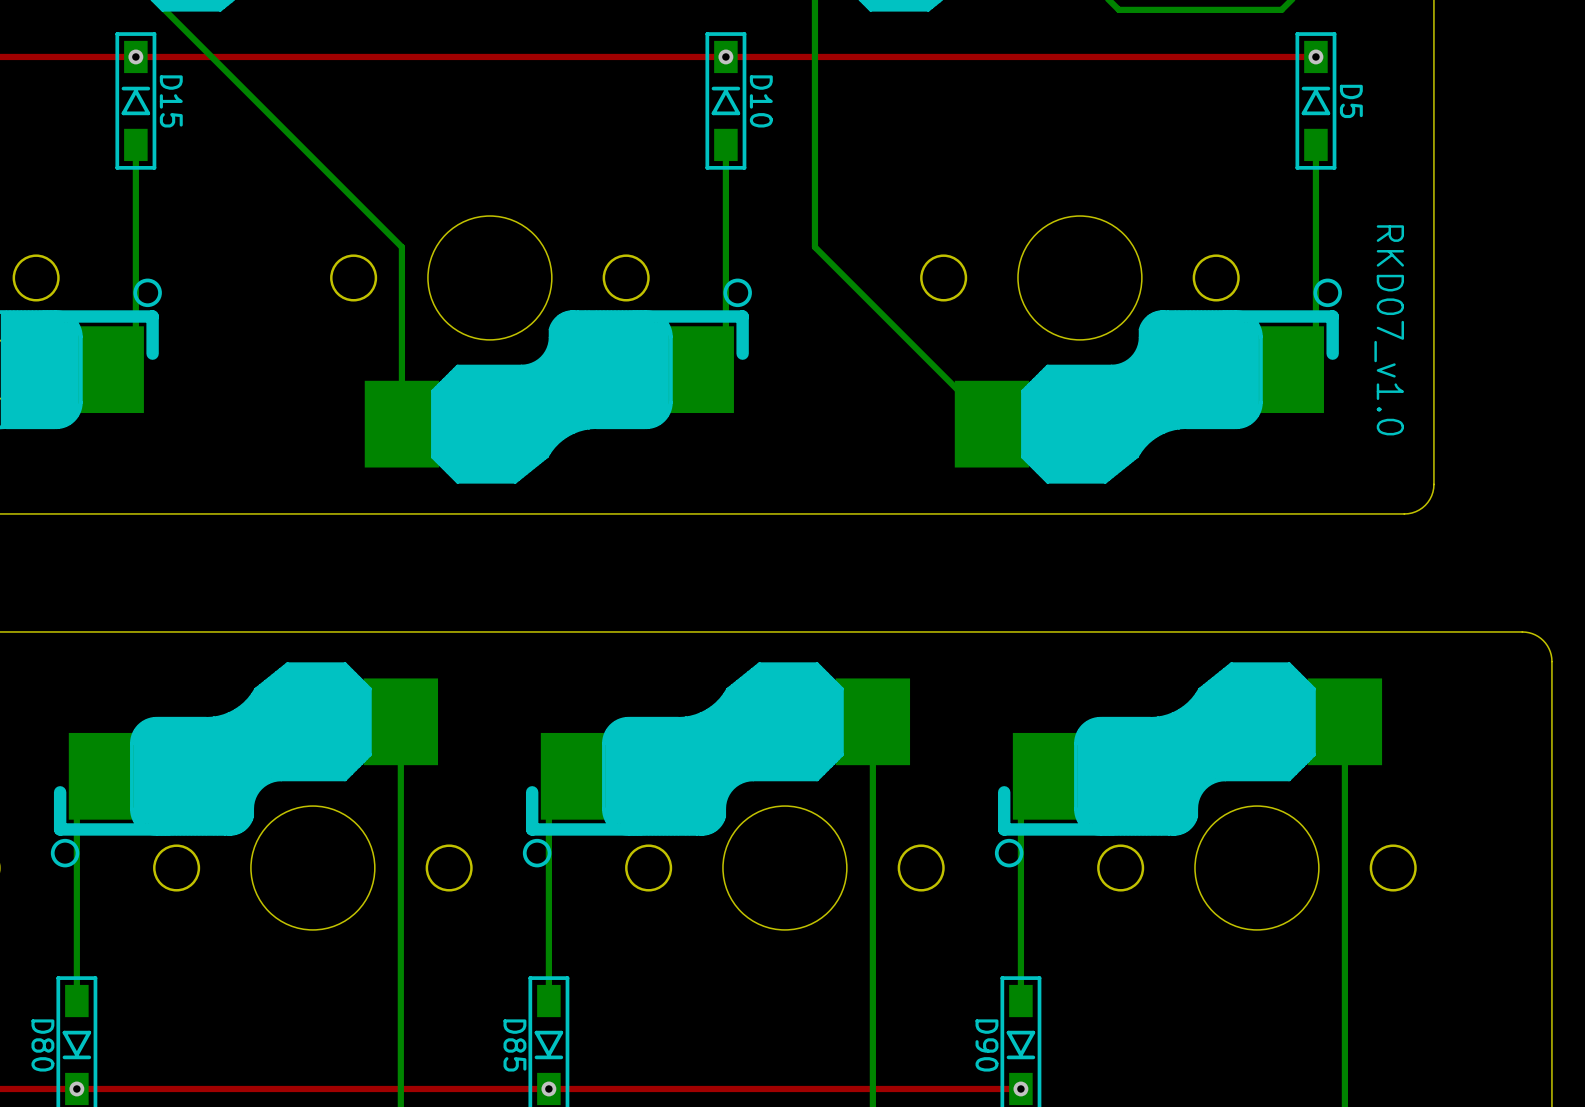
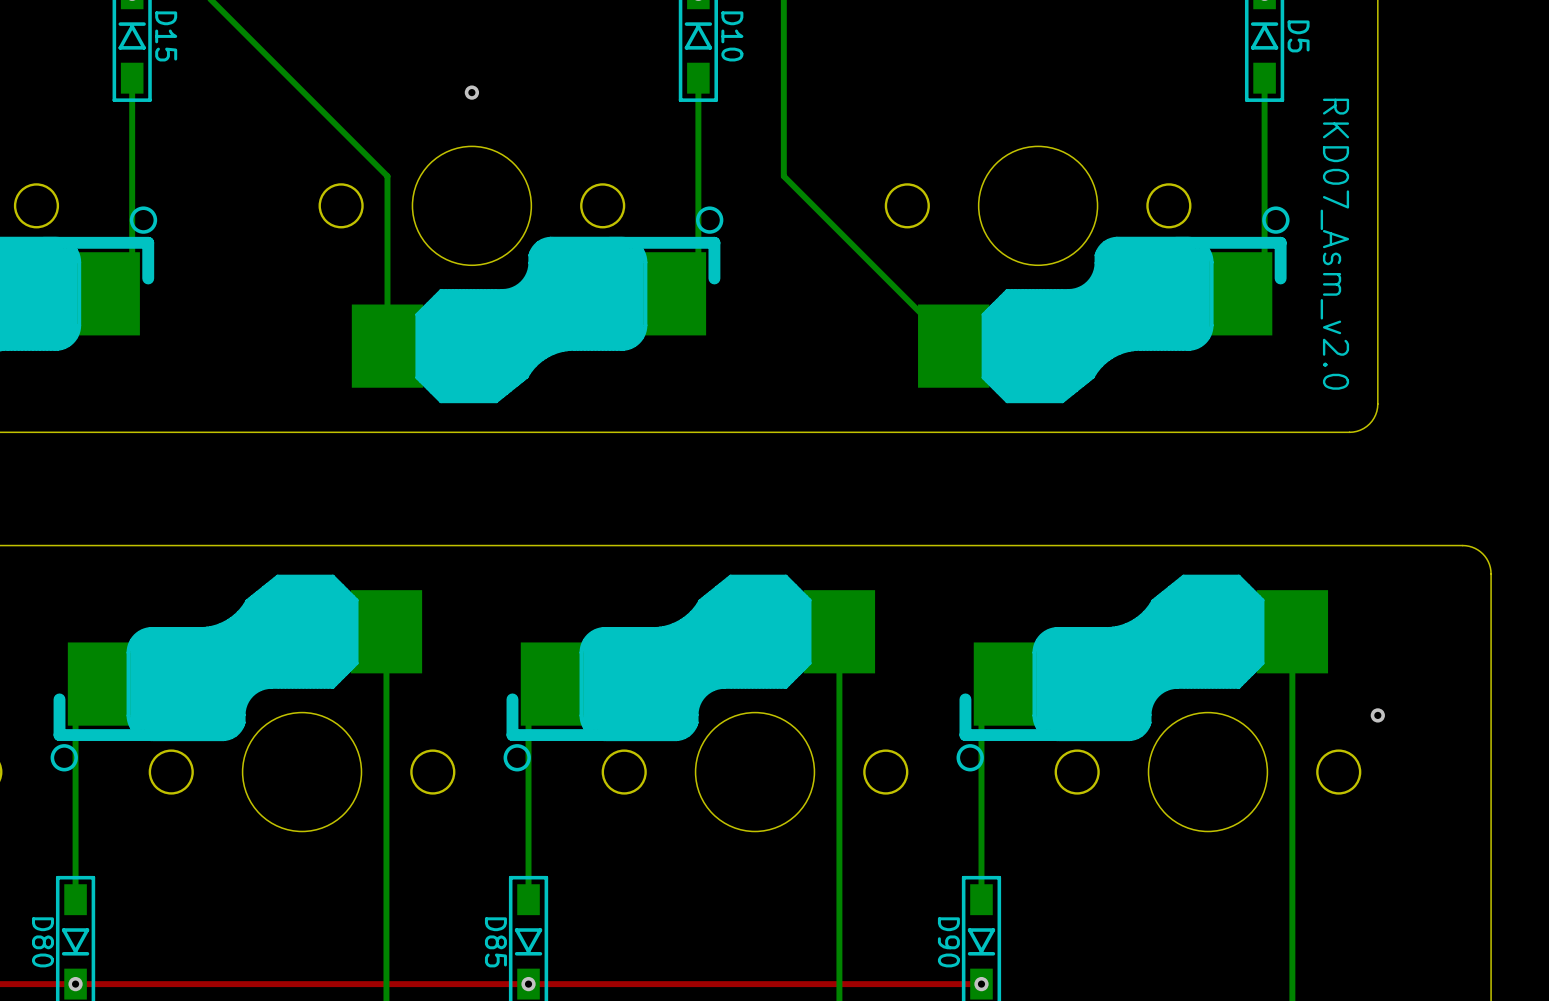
via: none -> (471, 92)
text: RKD07_v1.0 (1389, 330) -> RKD07_Asm_v2.0 (1334, 244)
via: none -> (1377, 715)

